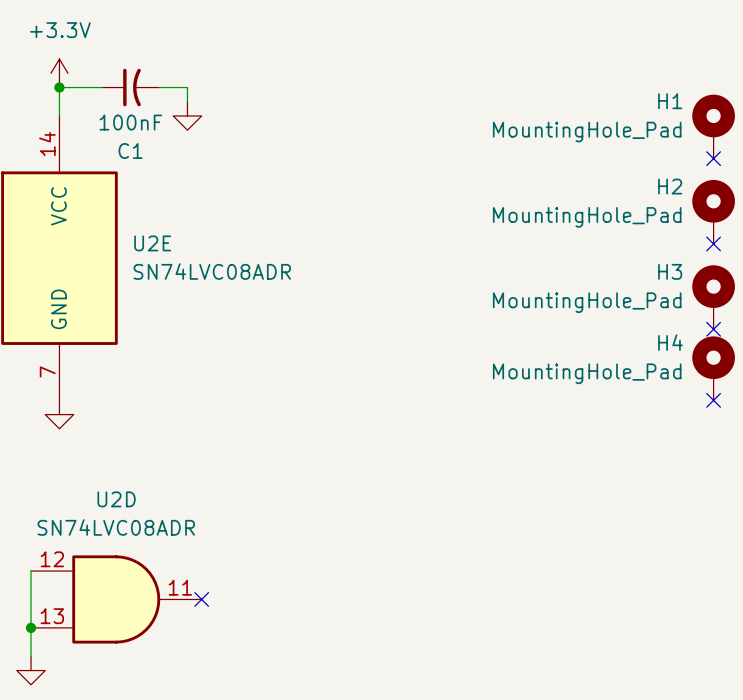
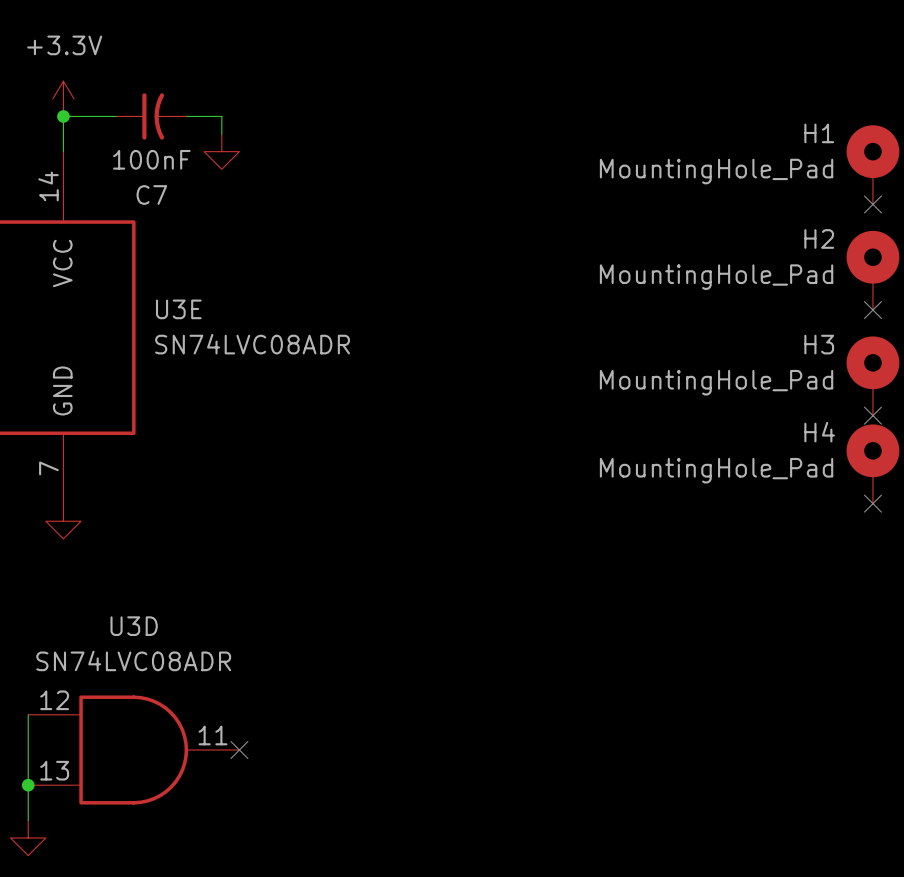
C1 name: C1 (130, 151) -> C7 (151, 194)
U2E name: U2E (152, 243) -> U3E (178, 309)
U2D name: U2D (116, 499) -> U3D (134, 626)

